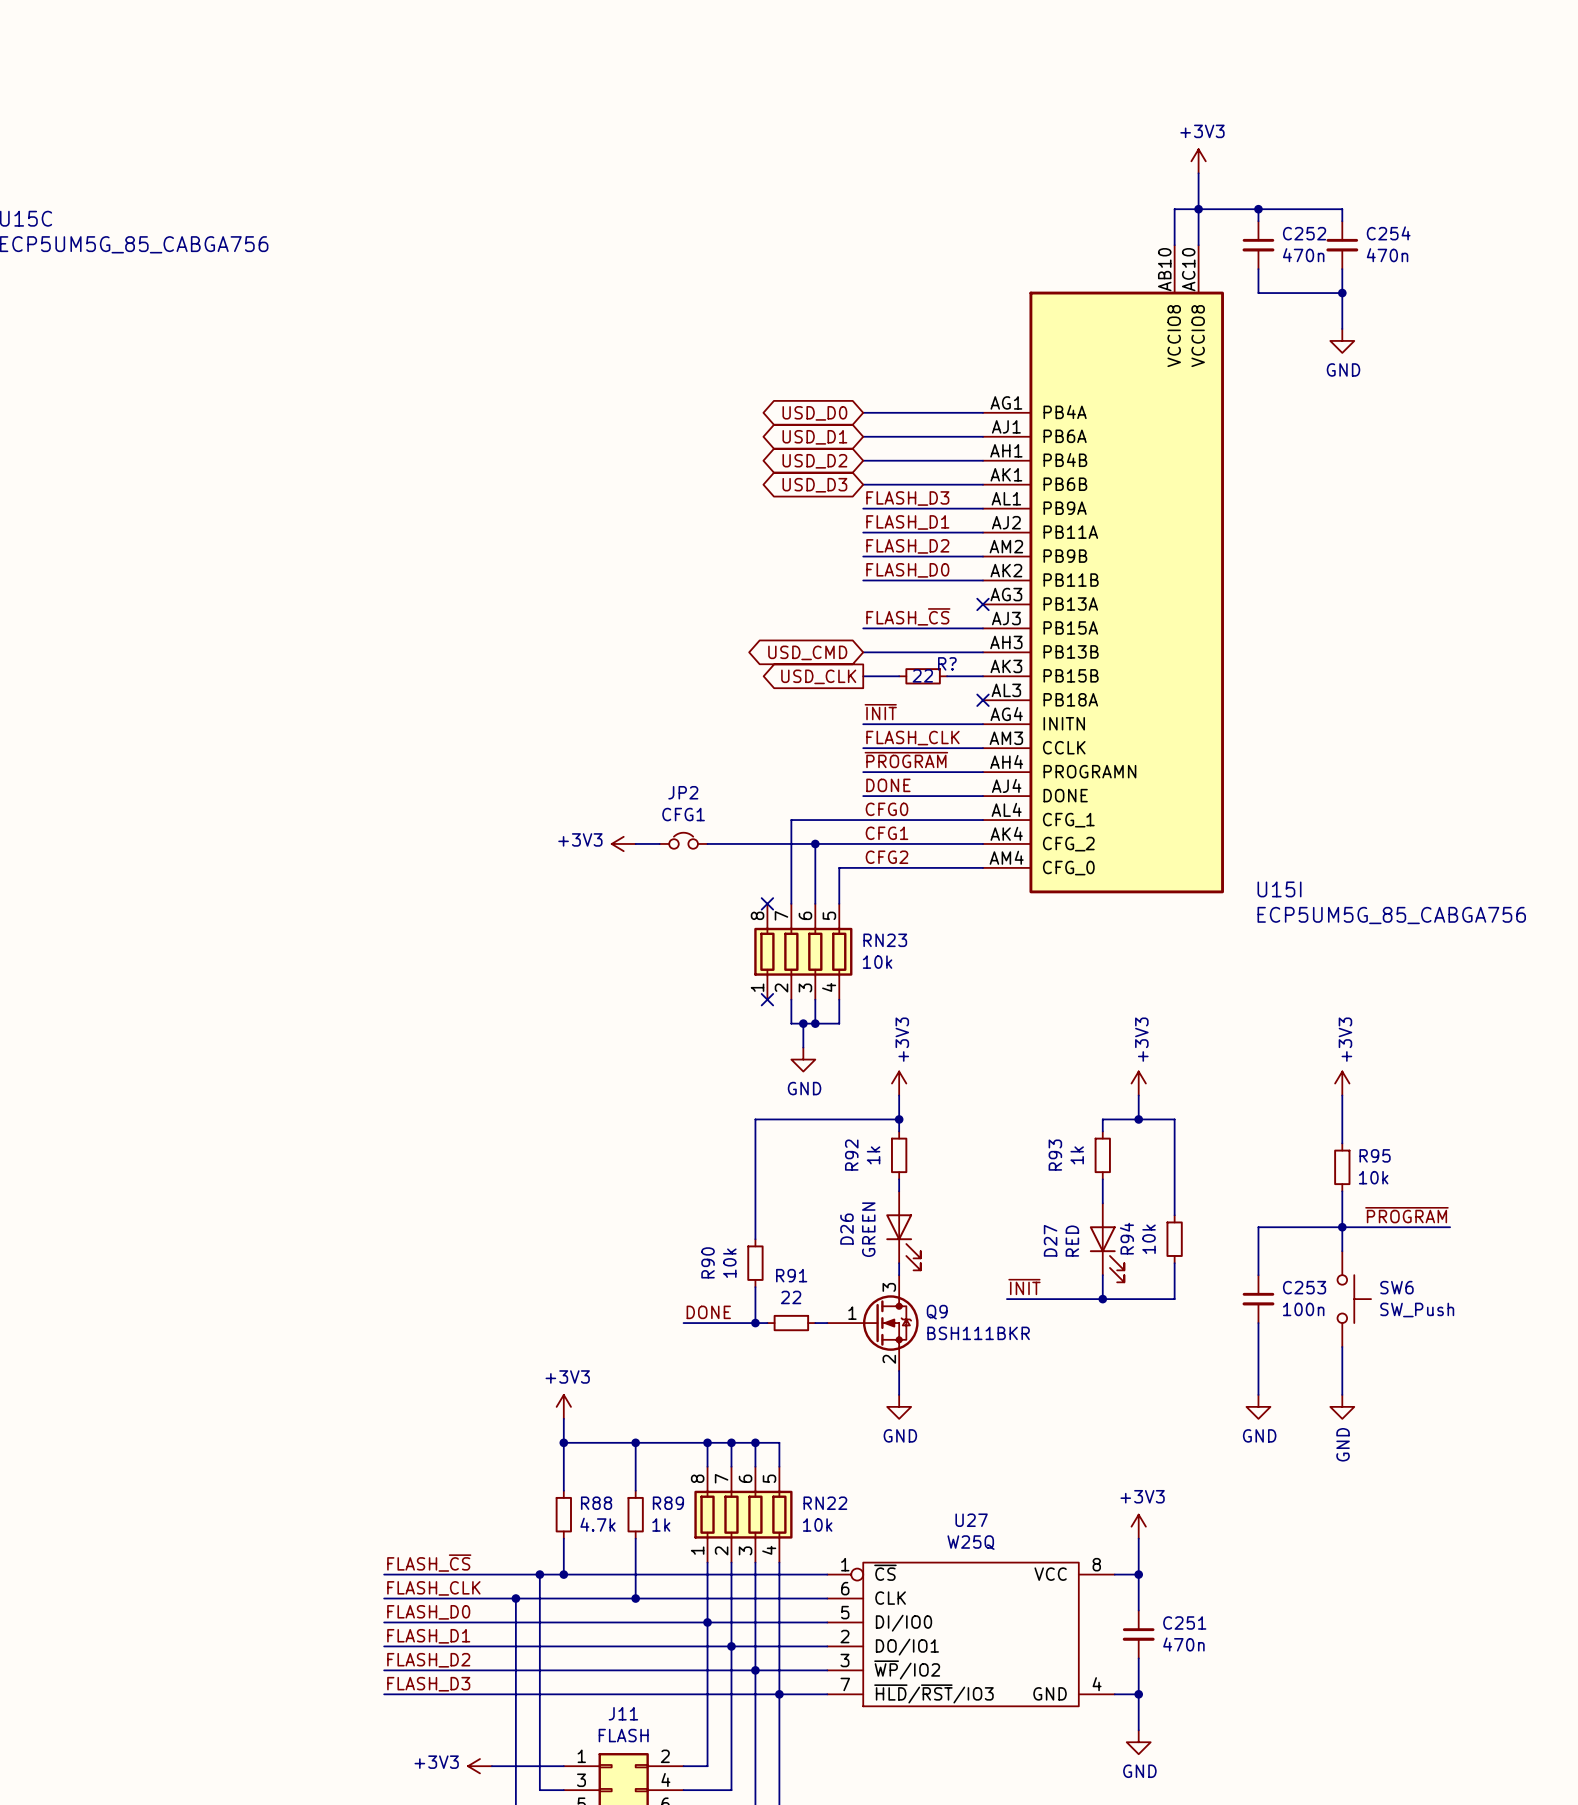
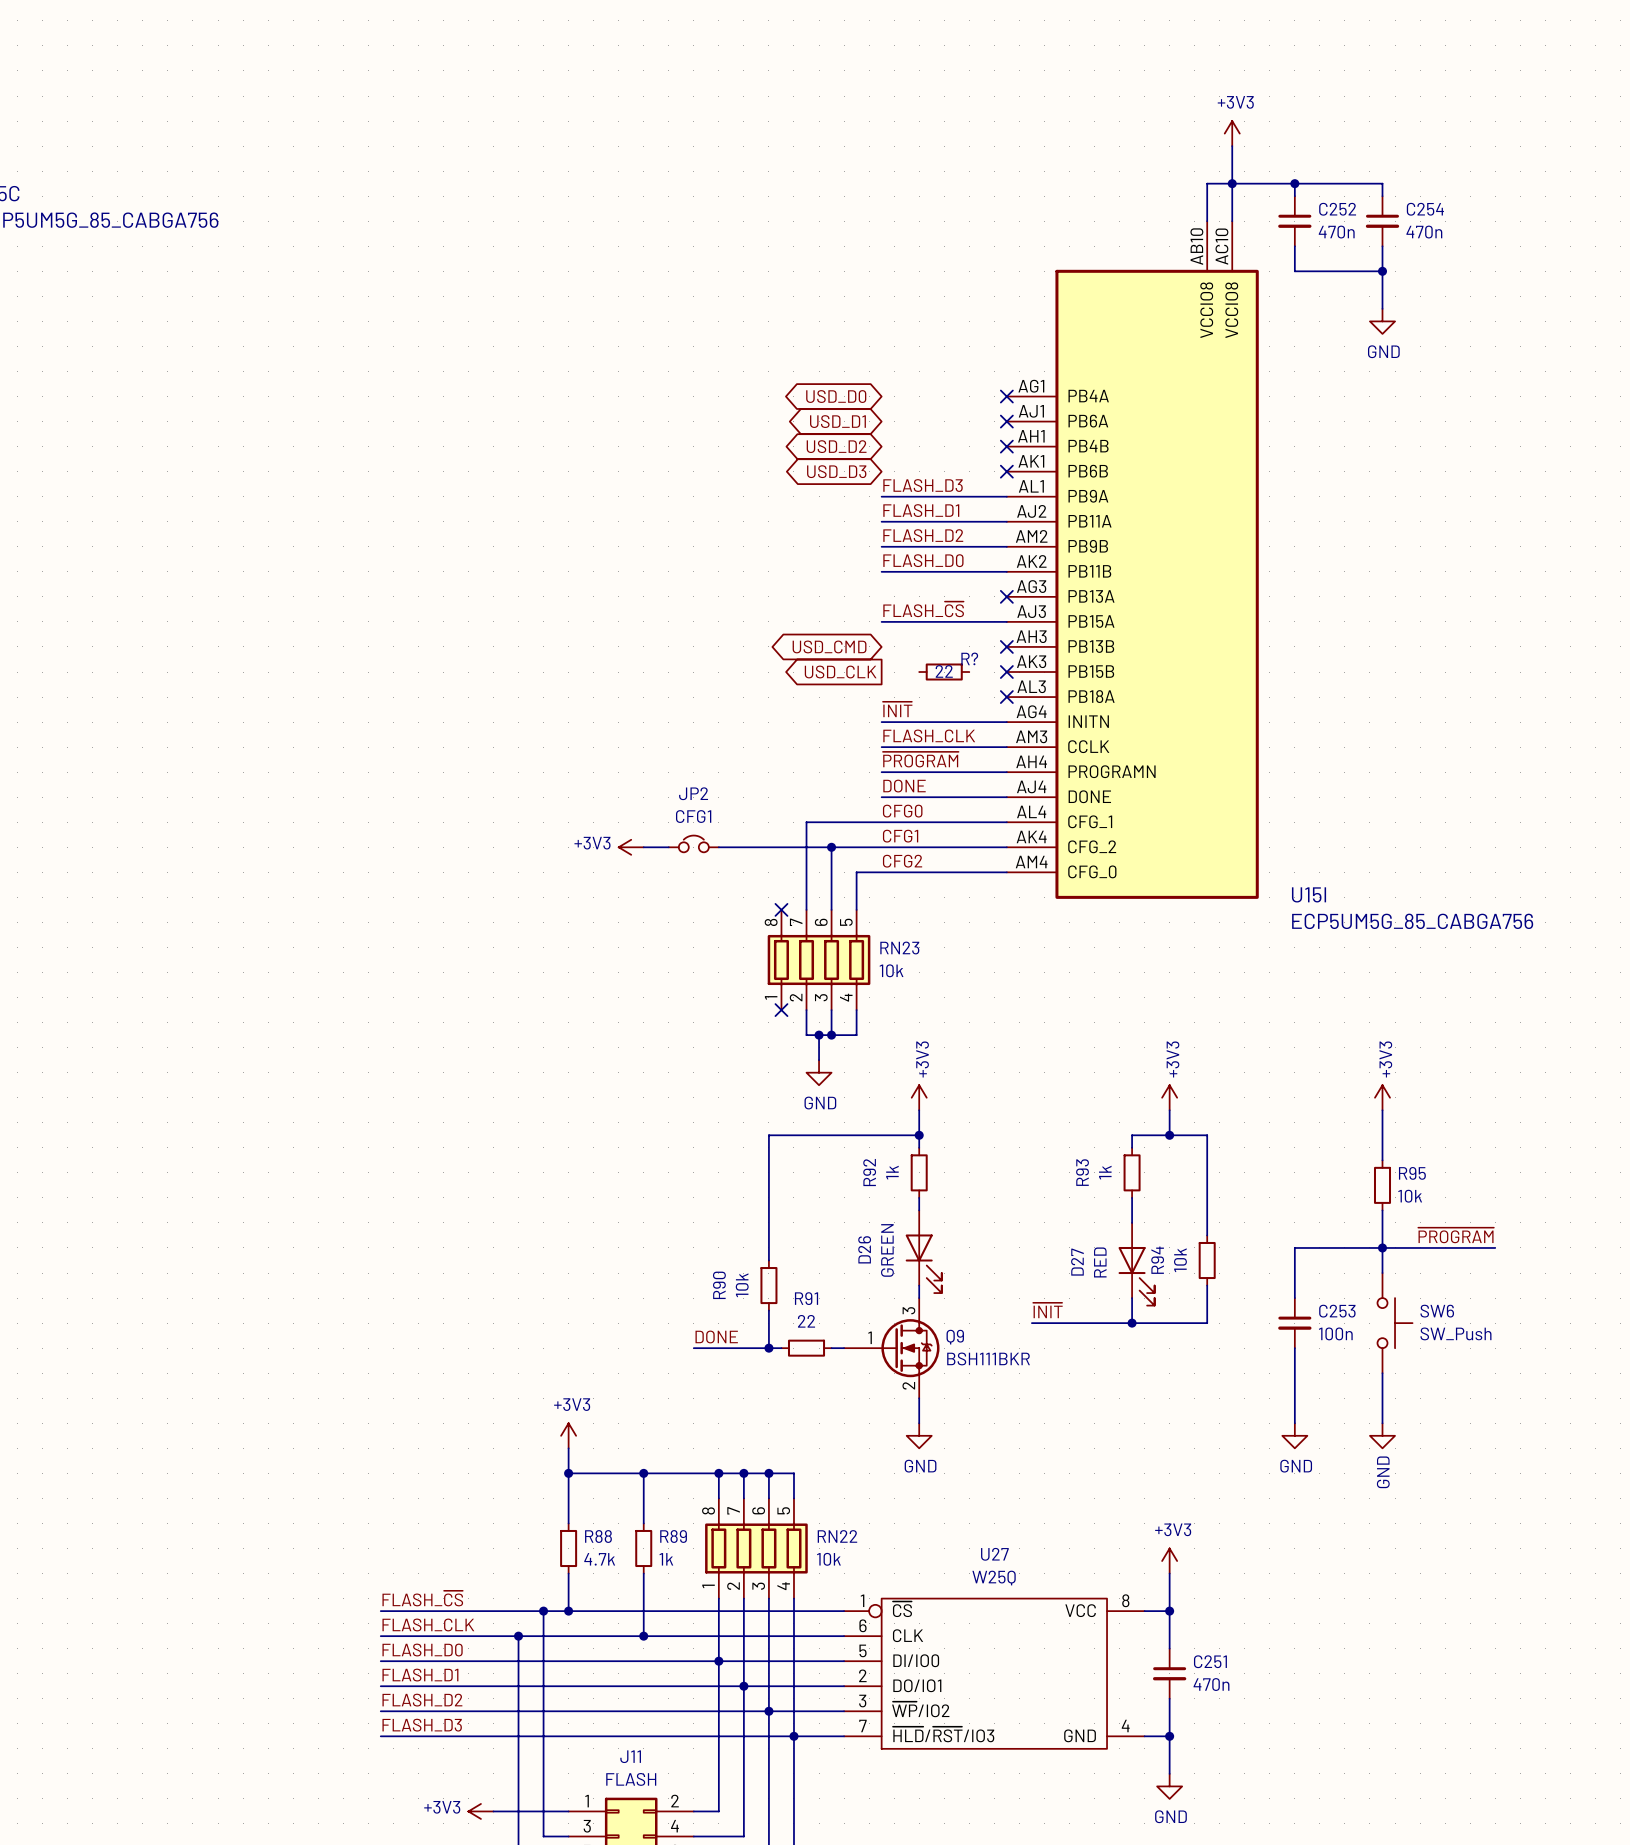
wire: (863, 412) (983, 412) -> none
no-connect mark: none -> (1006, 396)
wire: (863, 436) (983, 436) -> none
no-connect mark: none -> (1006, 421)
wire: (863, 460) (983, 460) -> none
no-connect mark: none -> (1006, 446)
wire: (863, 484) (983, 484) -> none
no-connect mark: none -> (1006, 471)
wire: (863, 652) (983, 652) -> none
no-connect mark: none -> (1006, 646)
wire: (863, 676) (899, 676) -> none
wire: (947, 676) (983, 676) -> none
no-connect mark: none -> (1006, 672)

